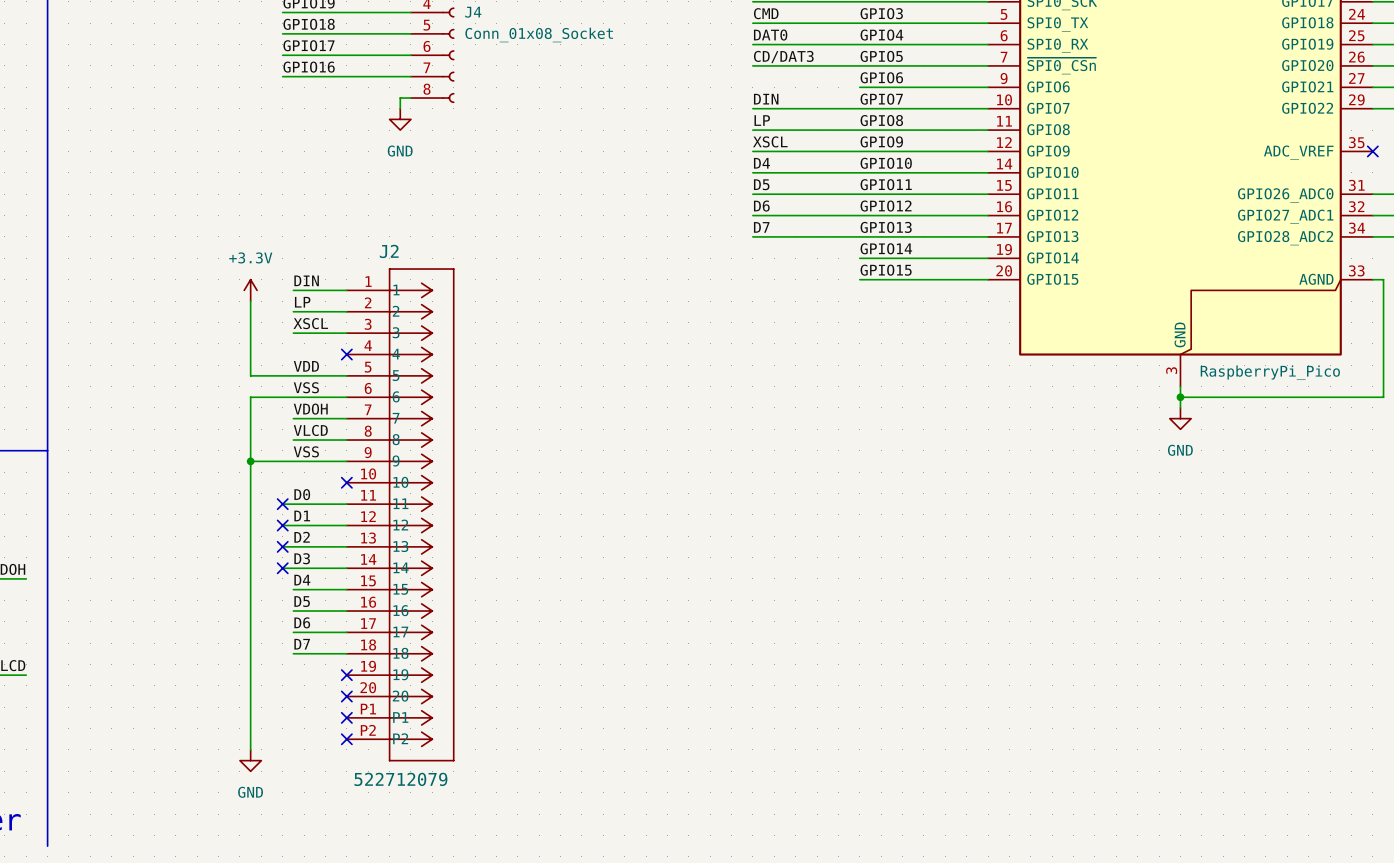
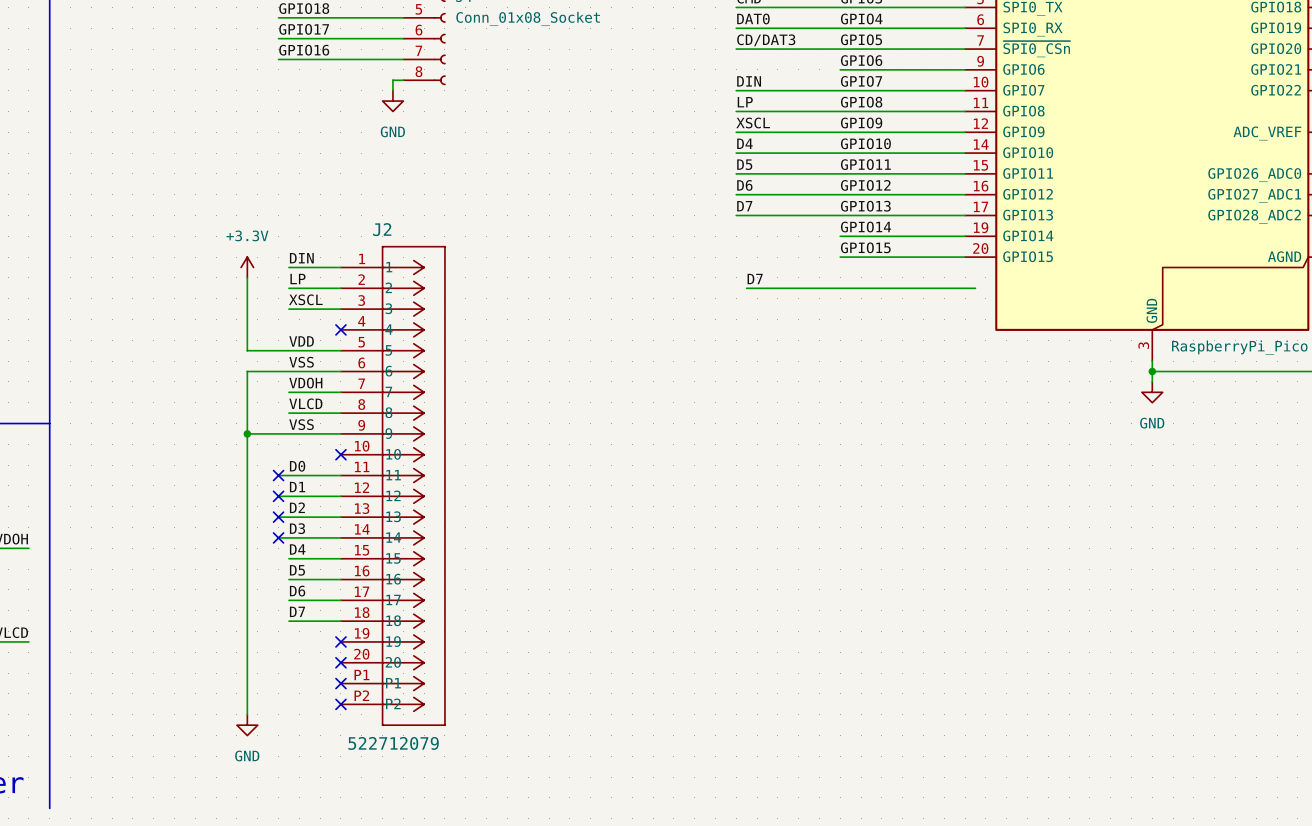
label: none -> D7 (755, 279)
wire: none -> (746, 288) (975, 288)

